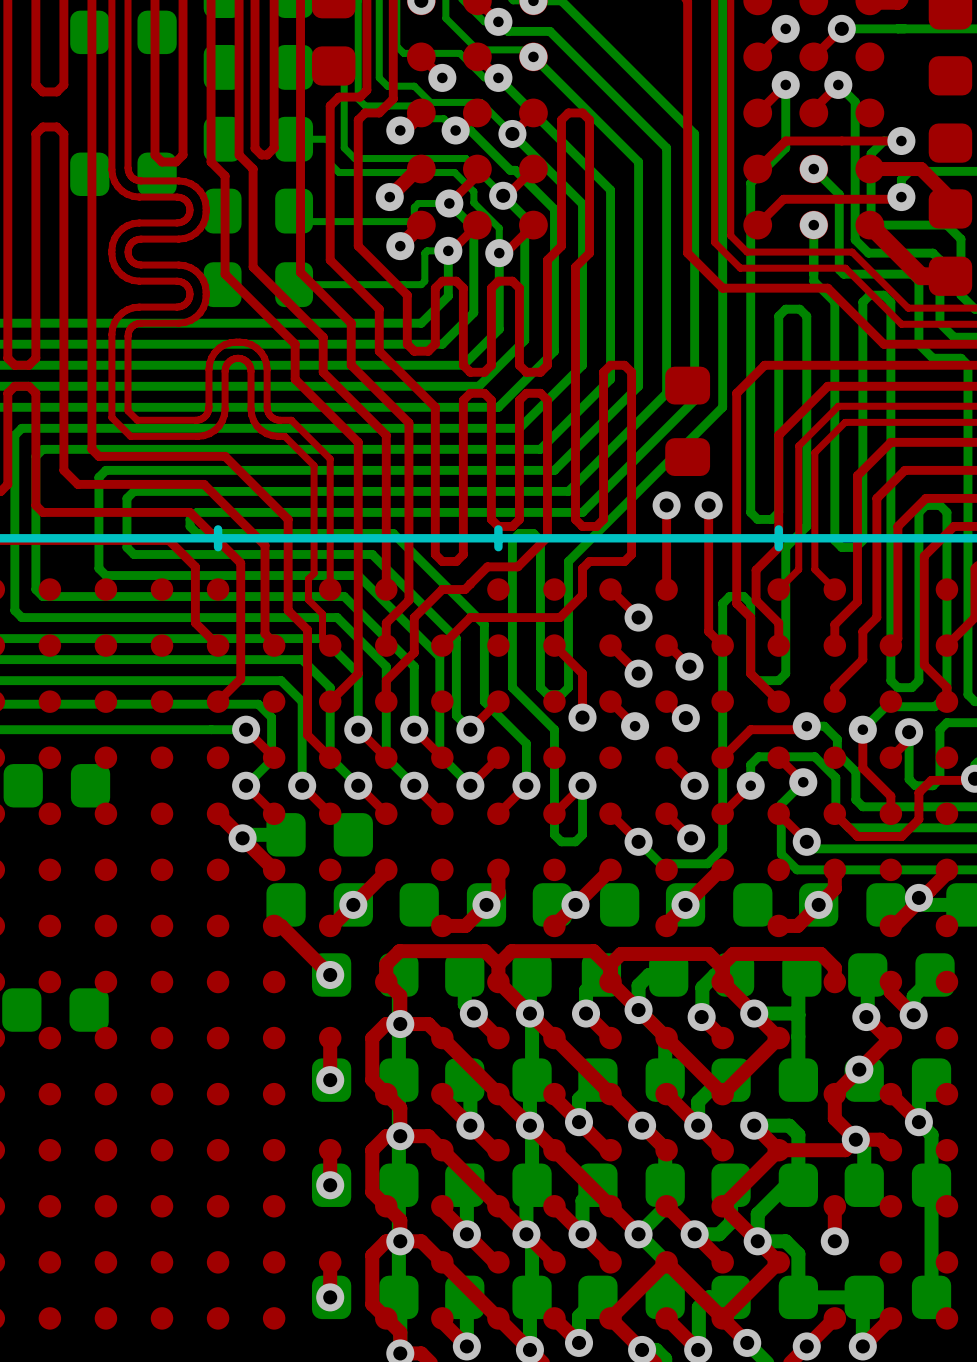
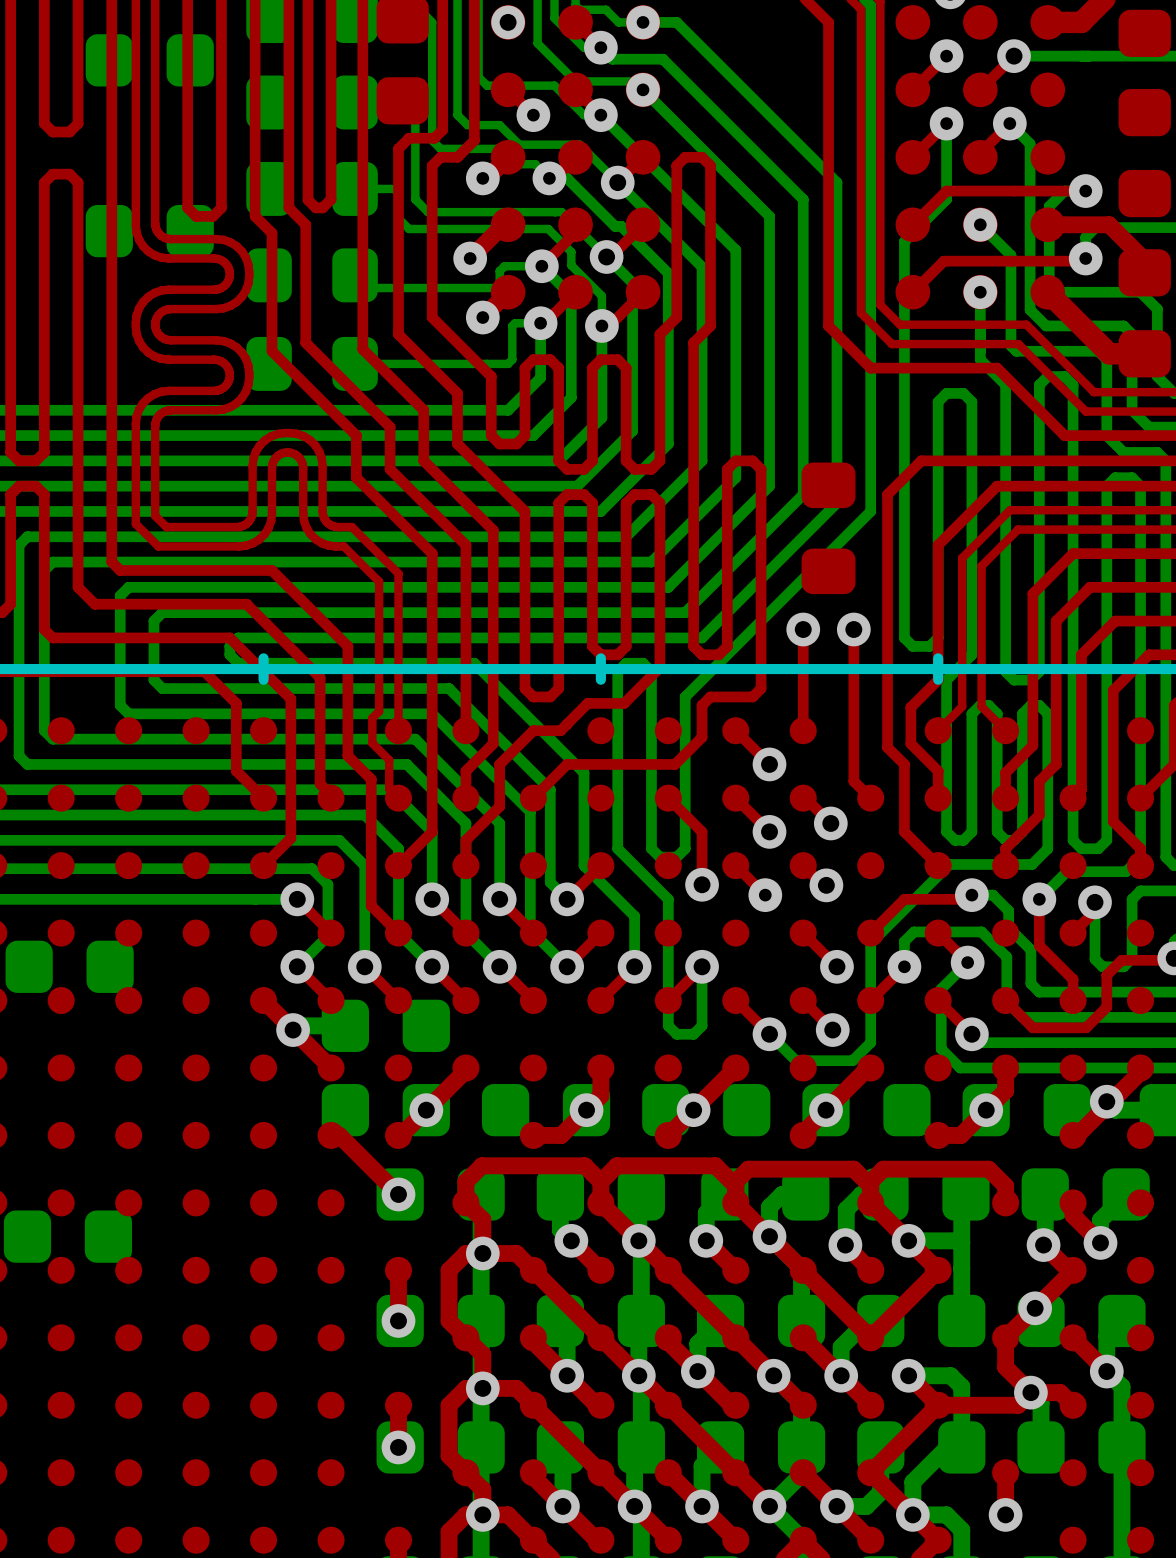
bottom track: (918, 512) (925, 505) (939, 505) (946, 512) -> (1106, 637) (1106, 486) (1115, 477) (1132, 477) (1140, 486) (1140, 637)
bottom track: (785, 673) (778, 680) (757, 680) (750, 673) (750, 603) (743, 596) (729, 596) (722, 603) (722, 766) -> (946, 831) (955, 840) (963, 840) (971, 831) (971, 713) (980, 705) (988, 705) (997, 713) (997, 831) (1005, 840) (1014, 840) (1022, 831) (1022, 713) (1030, 705) (1039, 705) (1047, 713) (1047, 848) (1032, 864) (949, 864) (870, 943)

